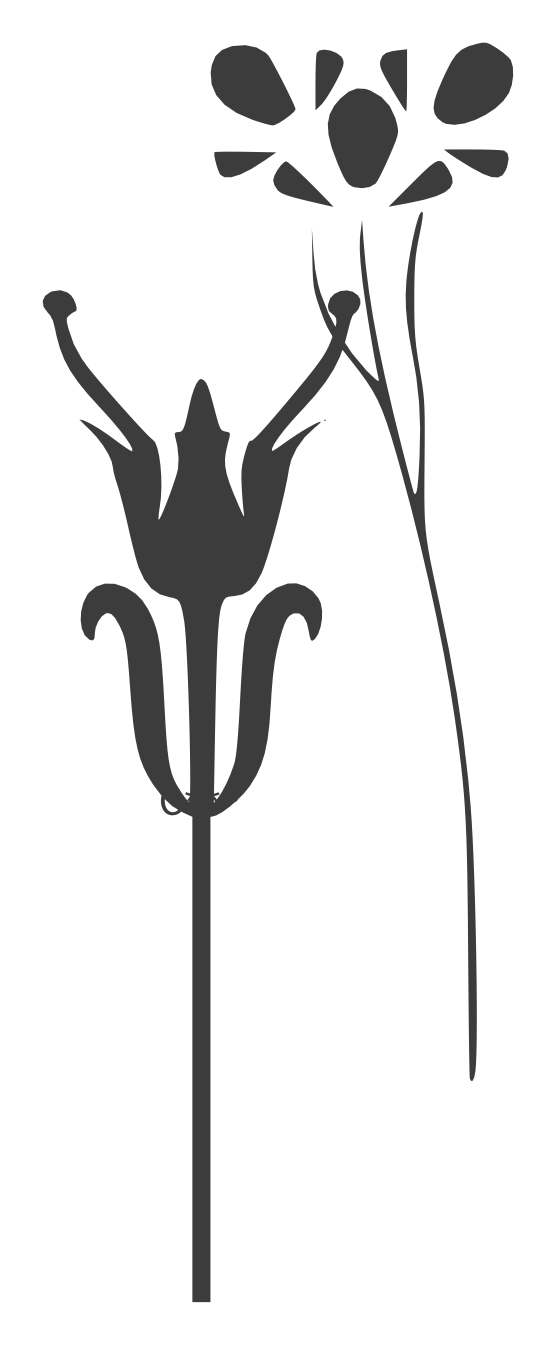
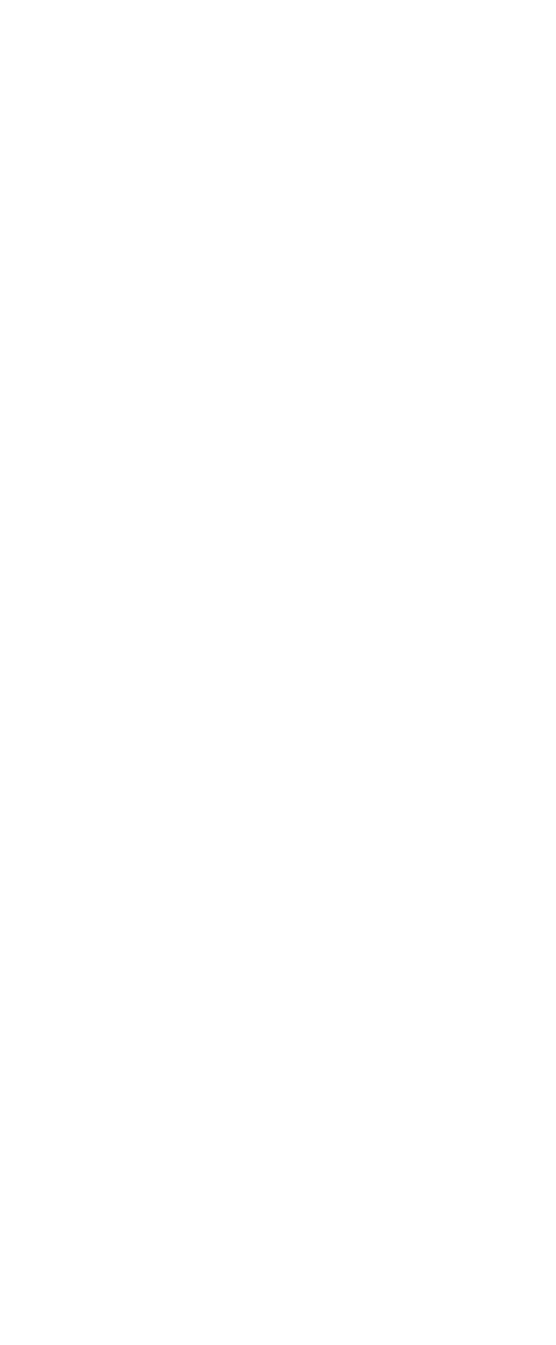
drawing: [210, 42, 514, 1081] -> none
part: (201, 796) -> none

